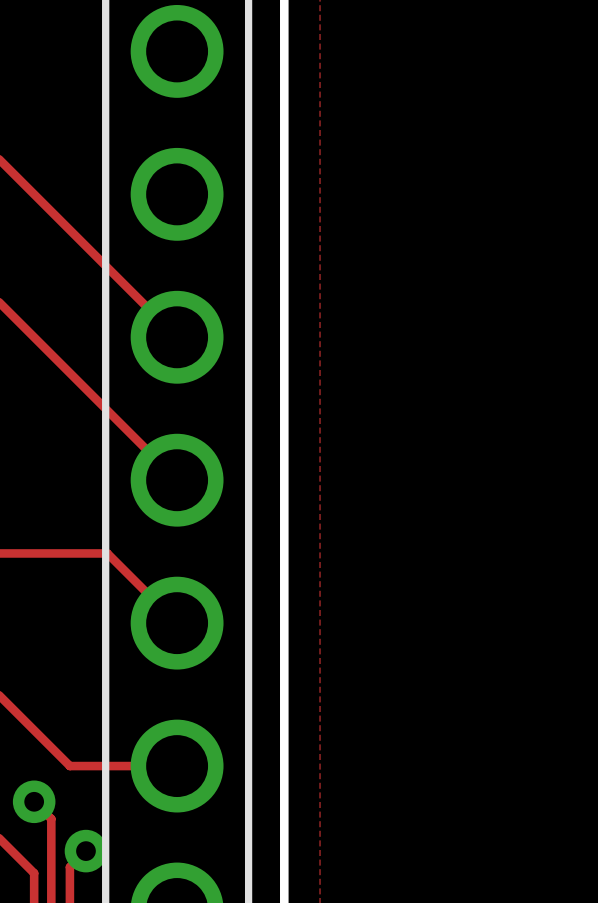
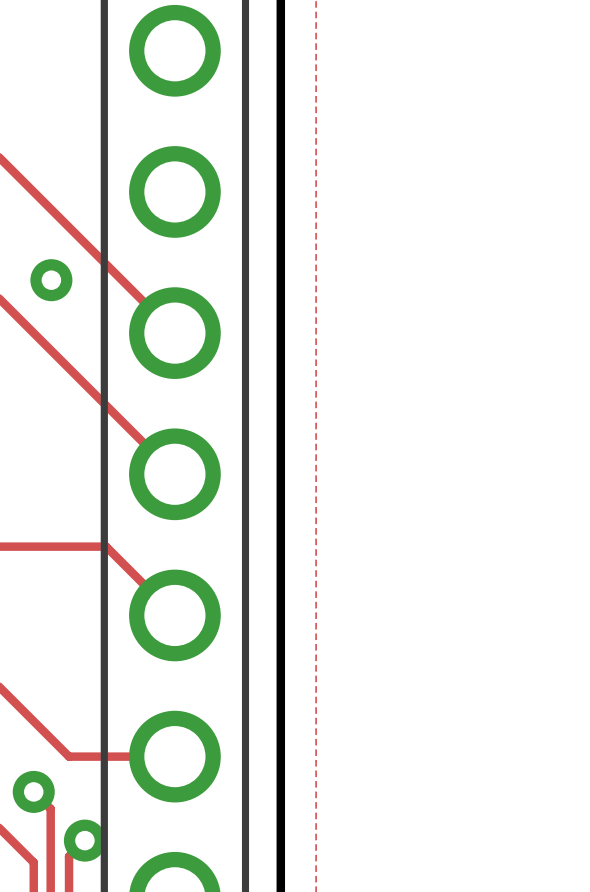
via: none -> (51, 280)

